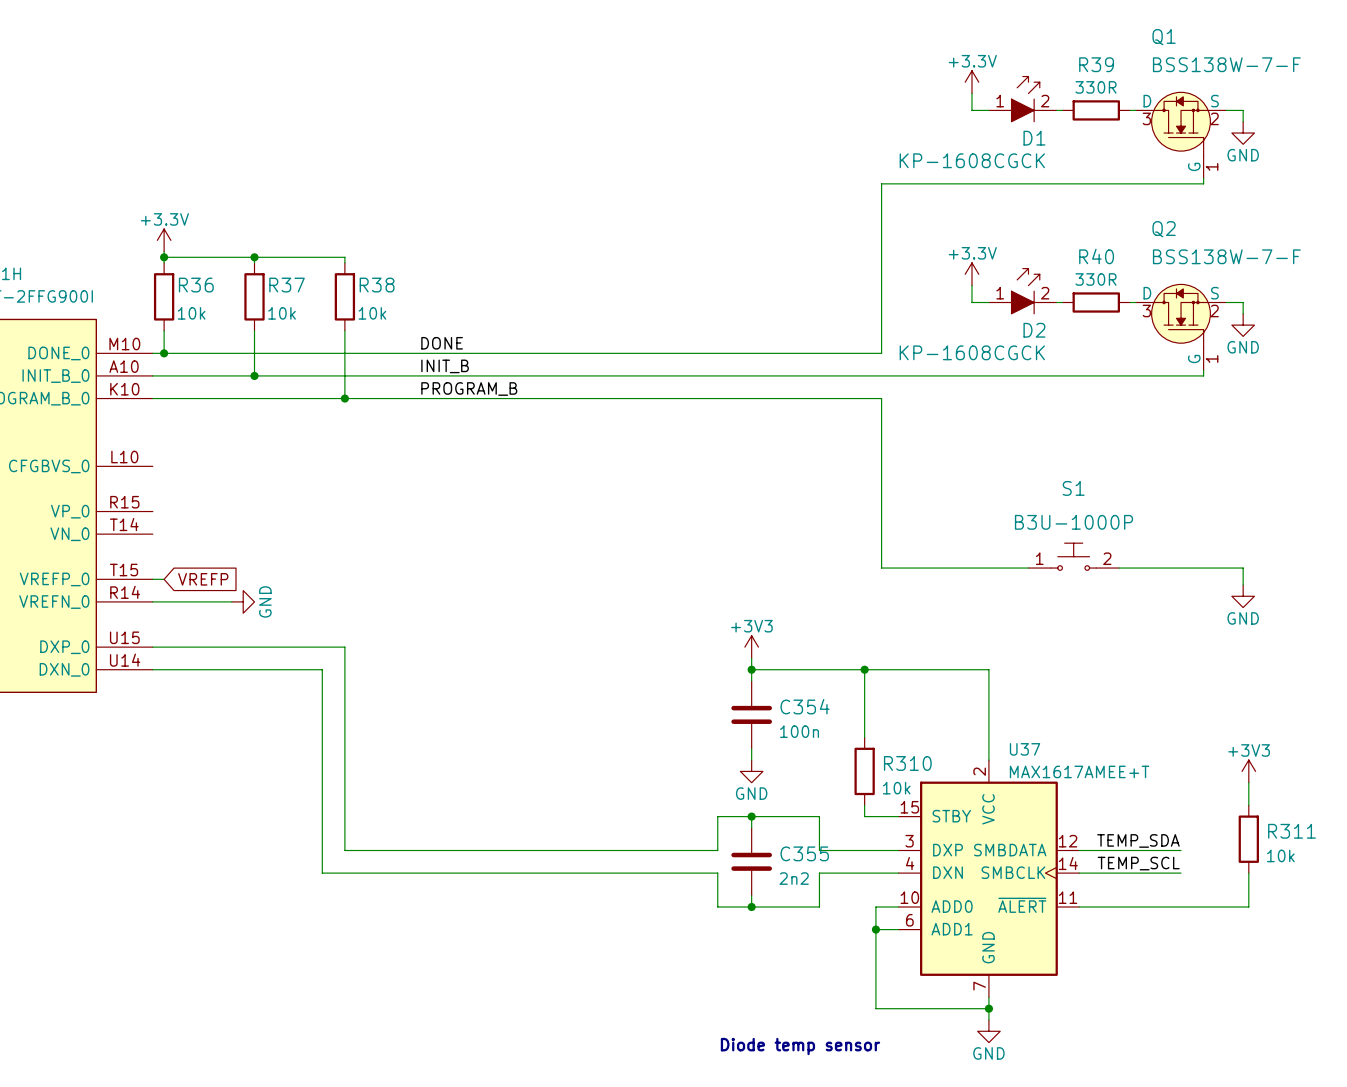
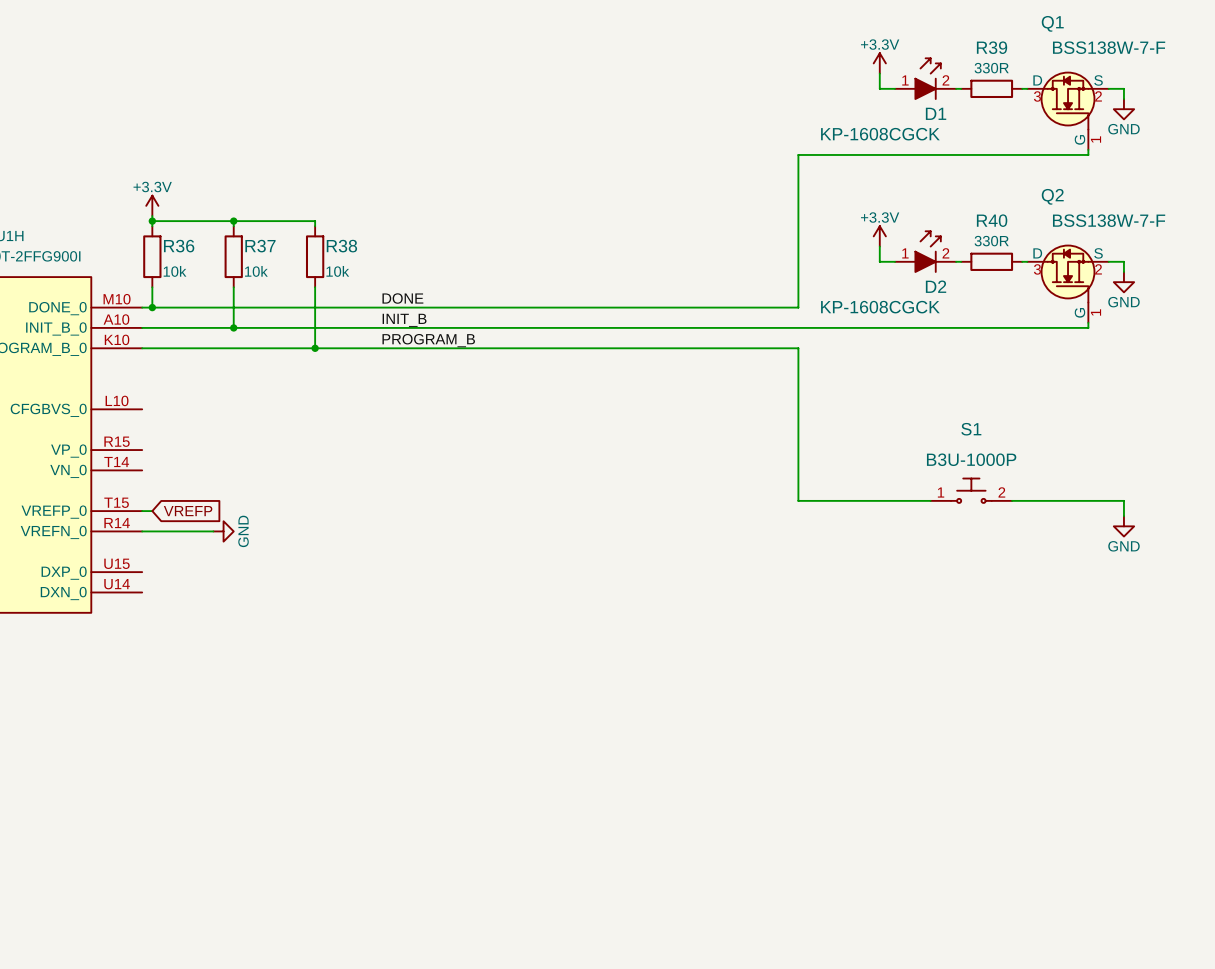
wire: (152, 647) (344, 647) (344, 850) (717, 850) (717, 816) (819, 816) (819, 850) (898, 850) -> none
power symbol: +3V3 (751, 647) -> none
wire: (751, 658) (751, 681) -> none
wire: (152, 669) (322, 669) (322, 873) (717, 873) (717, 907) (819, 907) (819, 873) (898, 873) -> none
wire: (751, 669) (988, 669) (988, 760) -> none
junction: (751, 669) -> none
wire: (864, 669) (864, 737) -> none
junction: (864, 669) -> none
C354: (751, 714) -> none
wire: (751, 748) (751, 760) -> none
power symbol: GND (751, 771) -> none
R310: (864, 771) -> none
power symbol: +3V3 (1248, 771) -> none
wire: (1248, 782) (1248, 805) -> none
wire: (864, 805) (864, 816) (898, 816) -> none
wire: (751, 816) (751, 827) -> none
junction: (751, 816) -> none
R311: (1248, 839) -> none
label: TEMP_SDA (1138, 840) -> none
wire: (1079, 850) (1181, 850) -> none
C355: (751, 861) -> none
label: TEMP_SCL (1138, 863) -> none
wire: (1079, 873) (1181, 873) -> none
wire: (1248, 873) (1248, 907) (1079, 907) -> none
U37: MAX1617AMEE+T (988, 878) -> none
wire: (751, 895) (751, 907) -> none
junction: (751, 907) -> none
wire: (898, 907) (875, 907) (875, 1008) (988, 1008) -> none
wire: (875, 929) (898, 929) -> none
junction: (875, 929) -> none
wire: (988, 997) (988, 1019) -> none
junction: (988, 1008) -> none
power symbol: GND (988, 1031) -> none
text: Diode temp sensor (800, 1046) -> none

